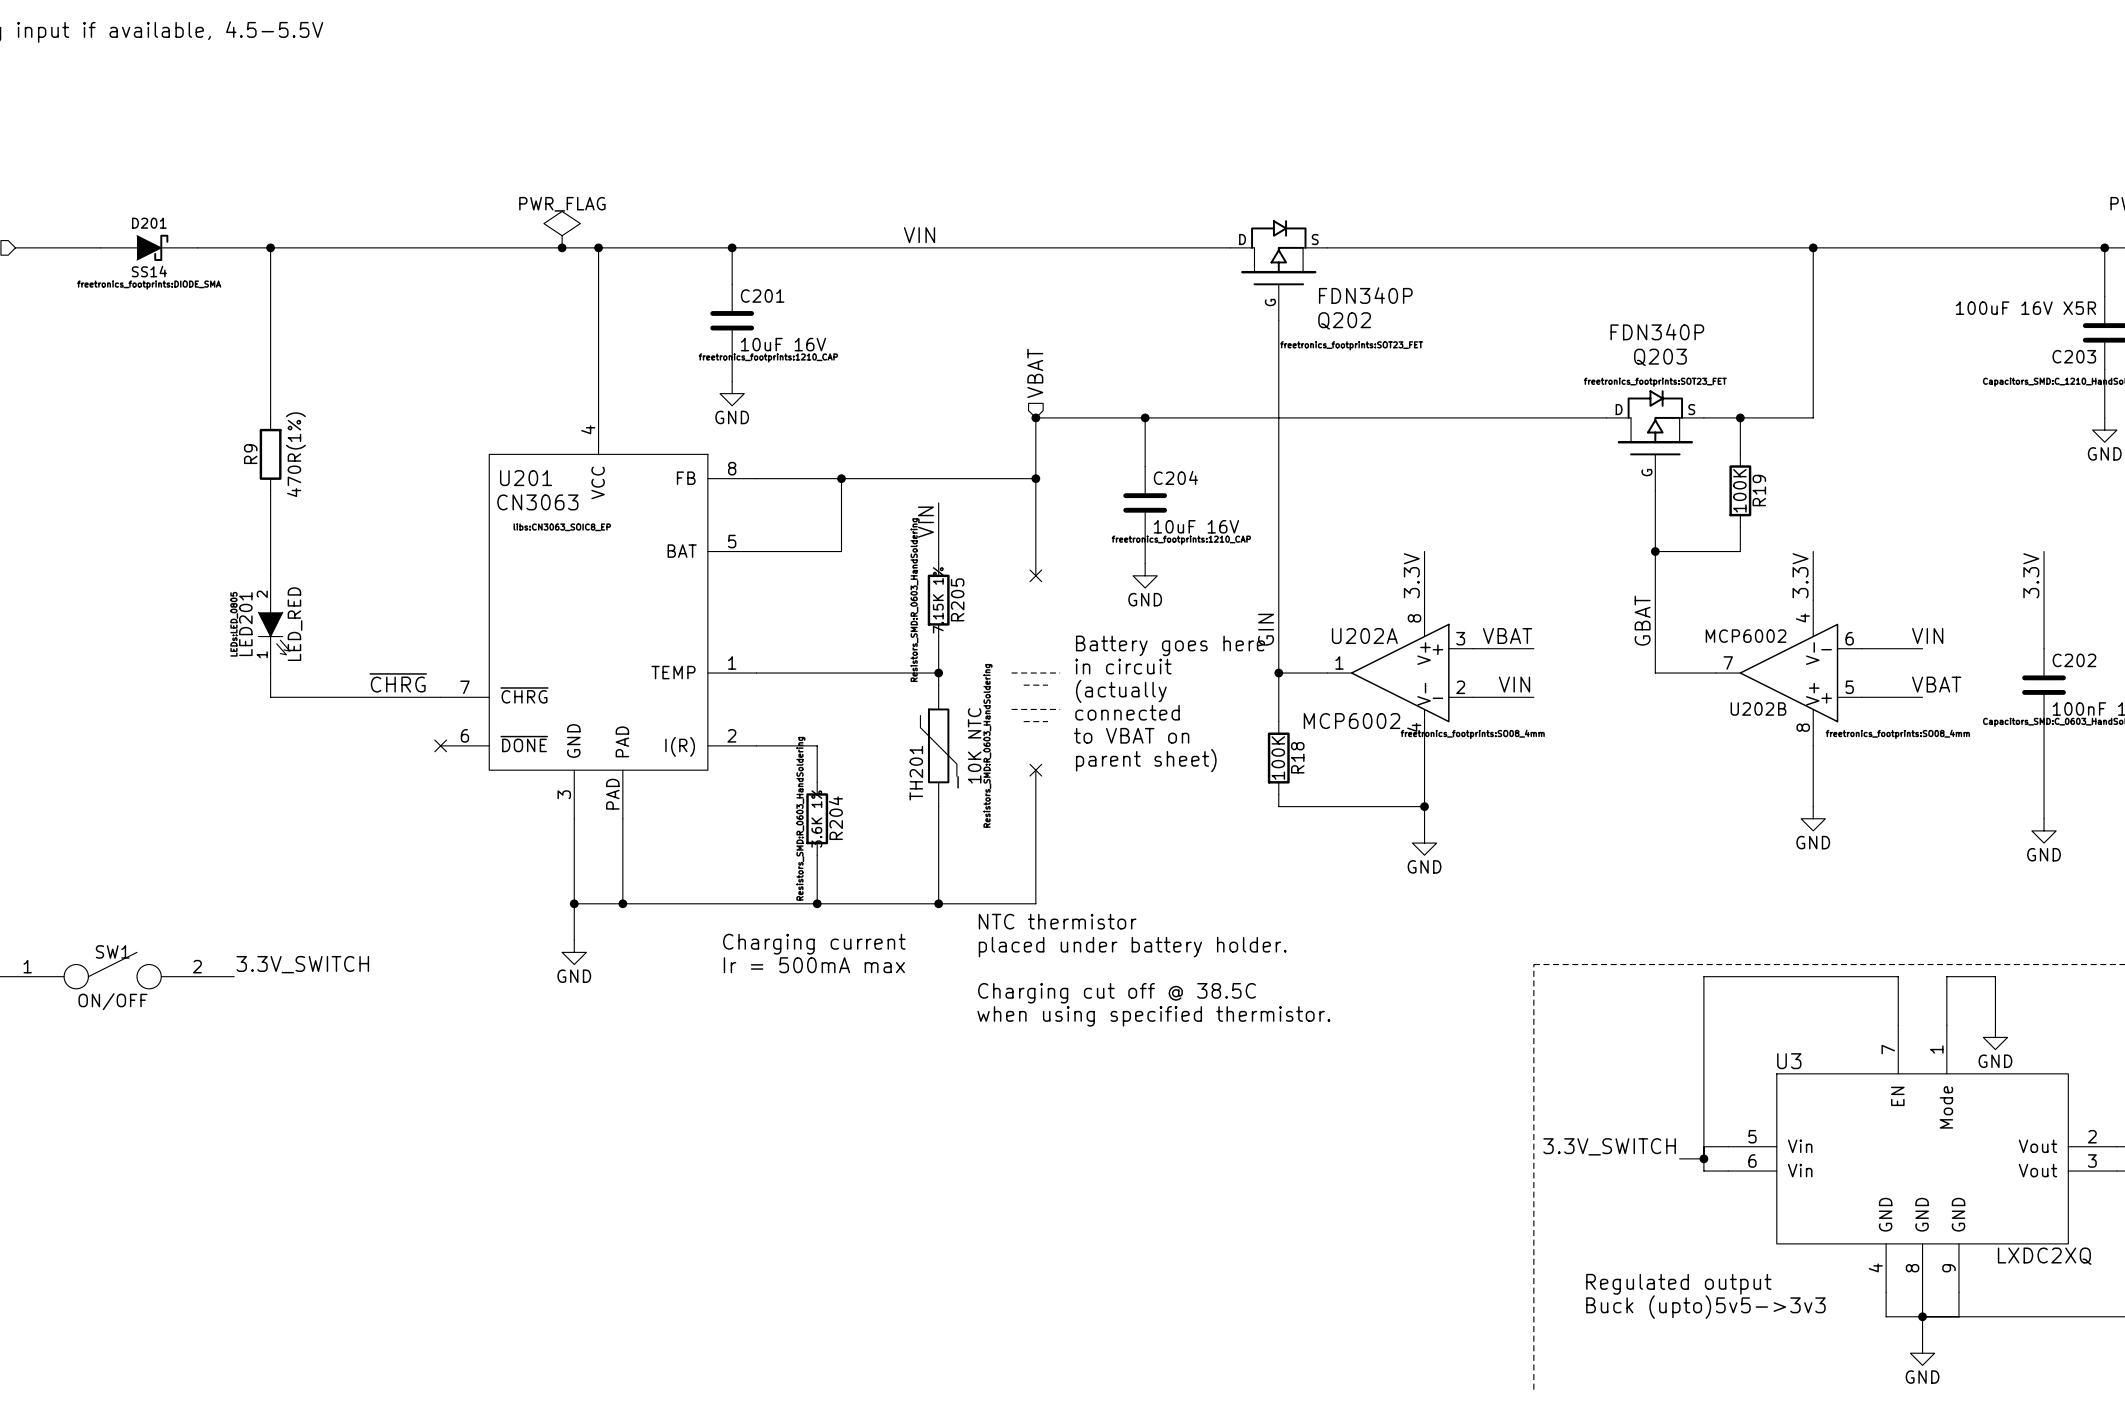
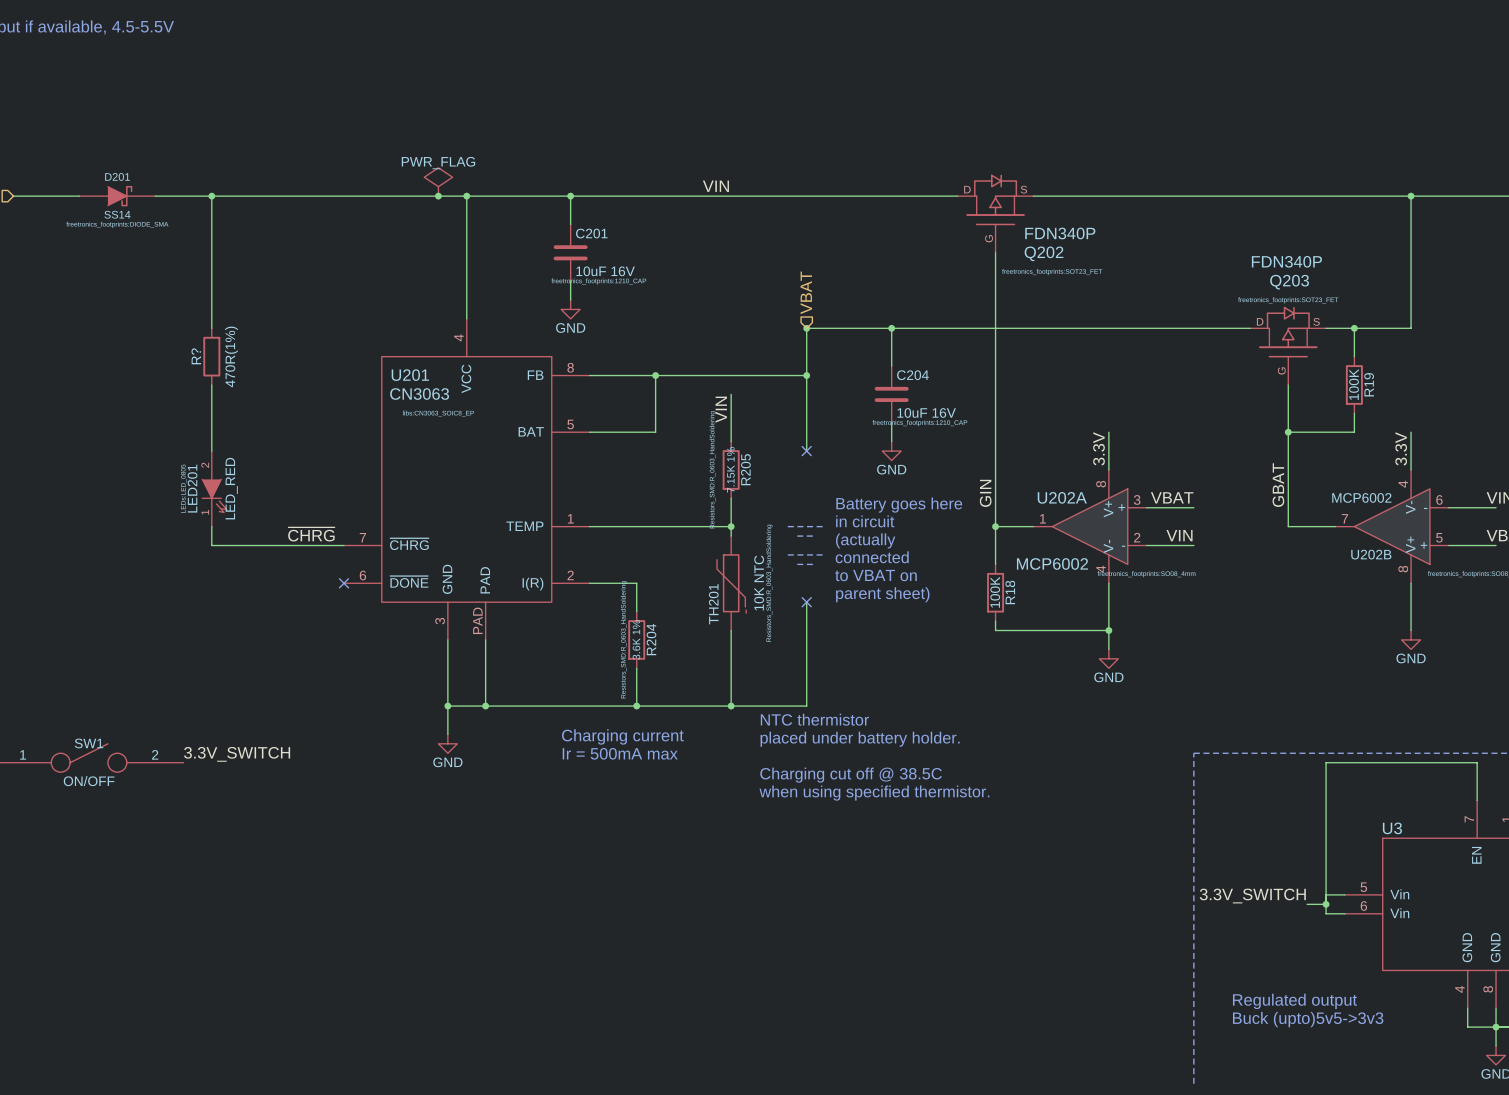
R9 name: R9 (250, 454) -> R? (196, 356)

